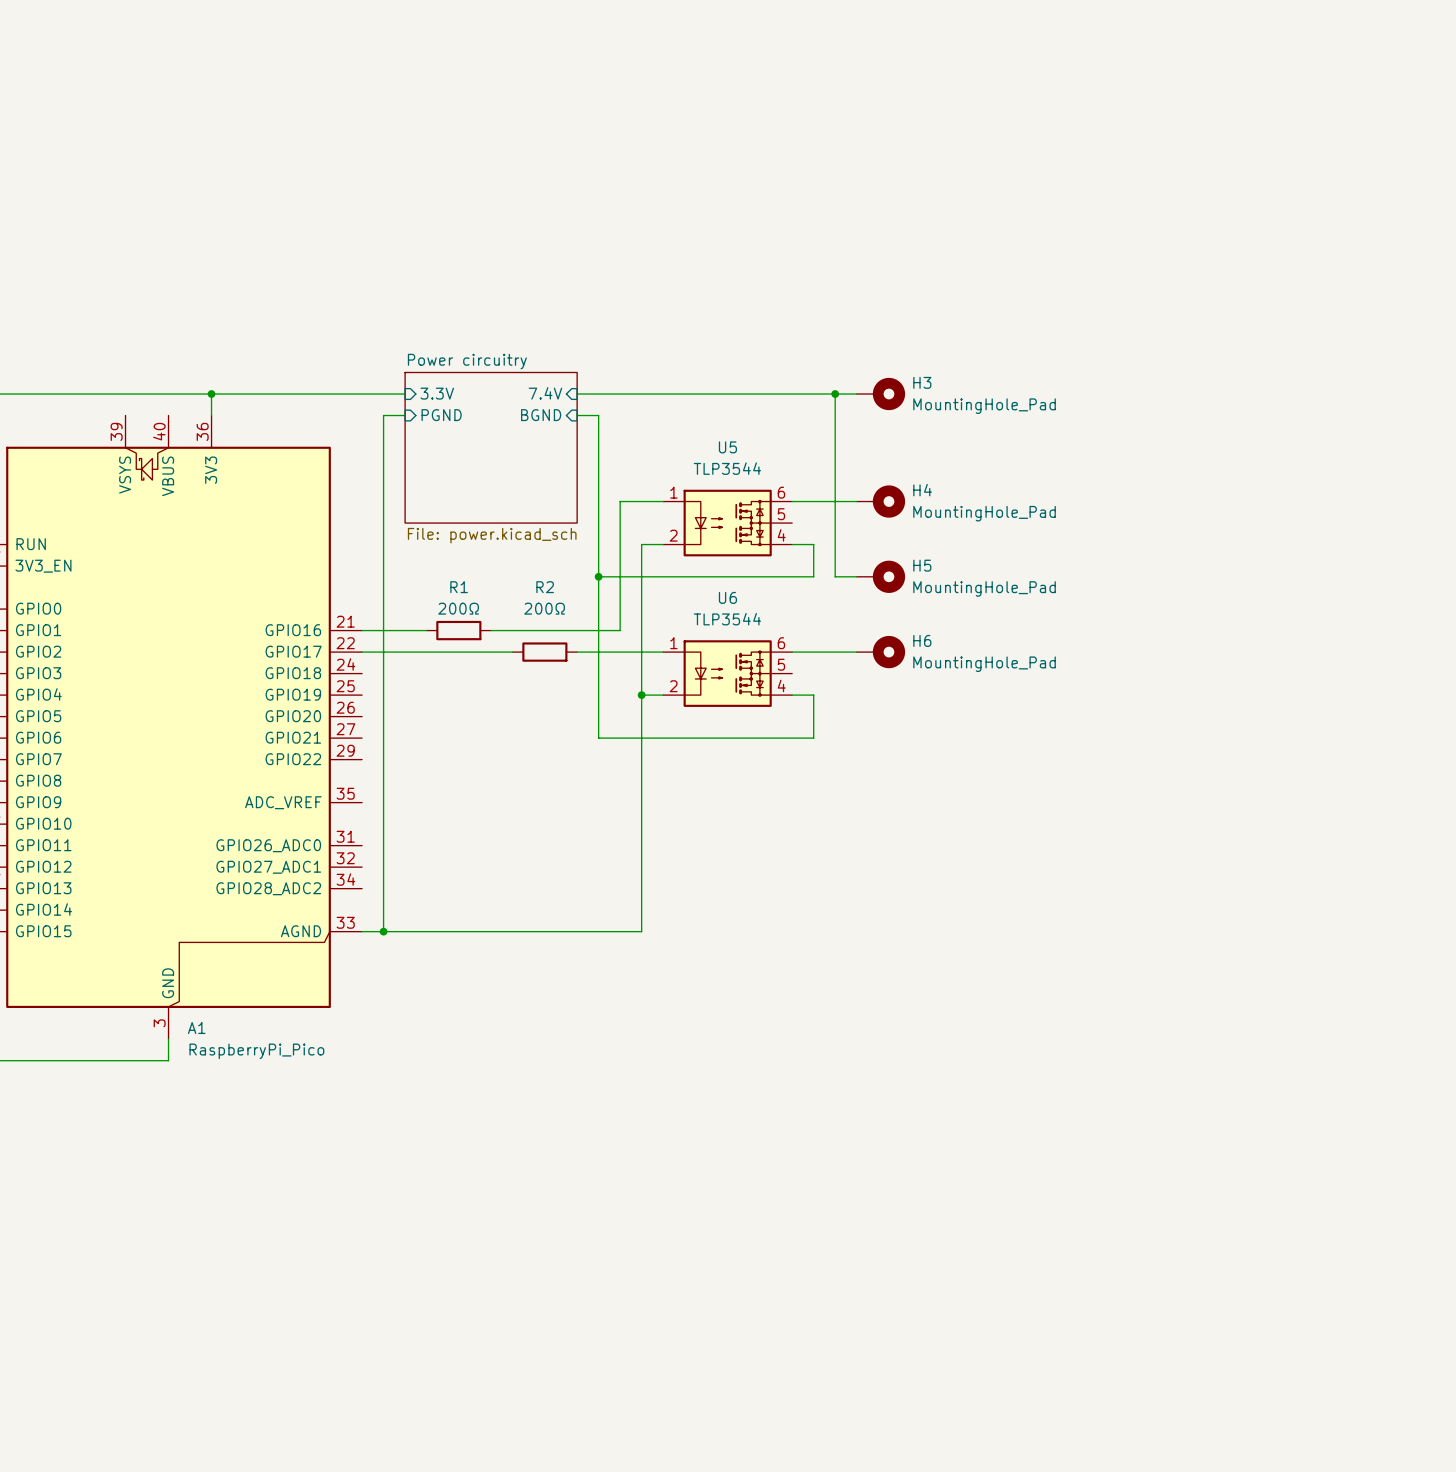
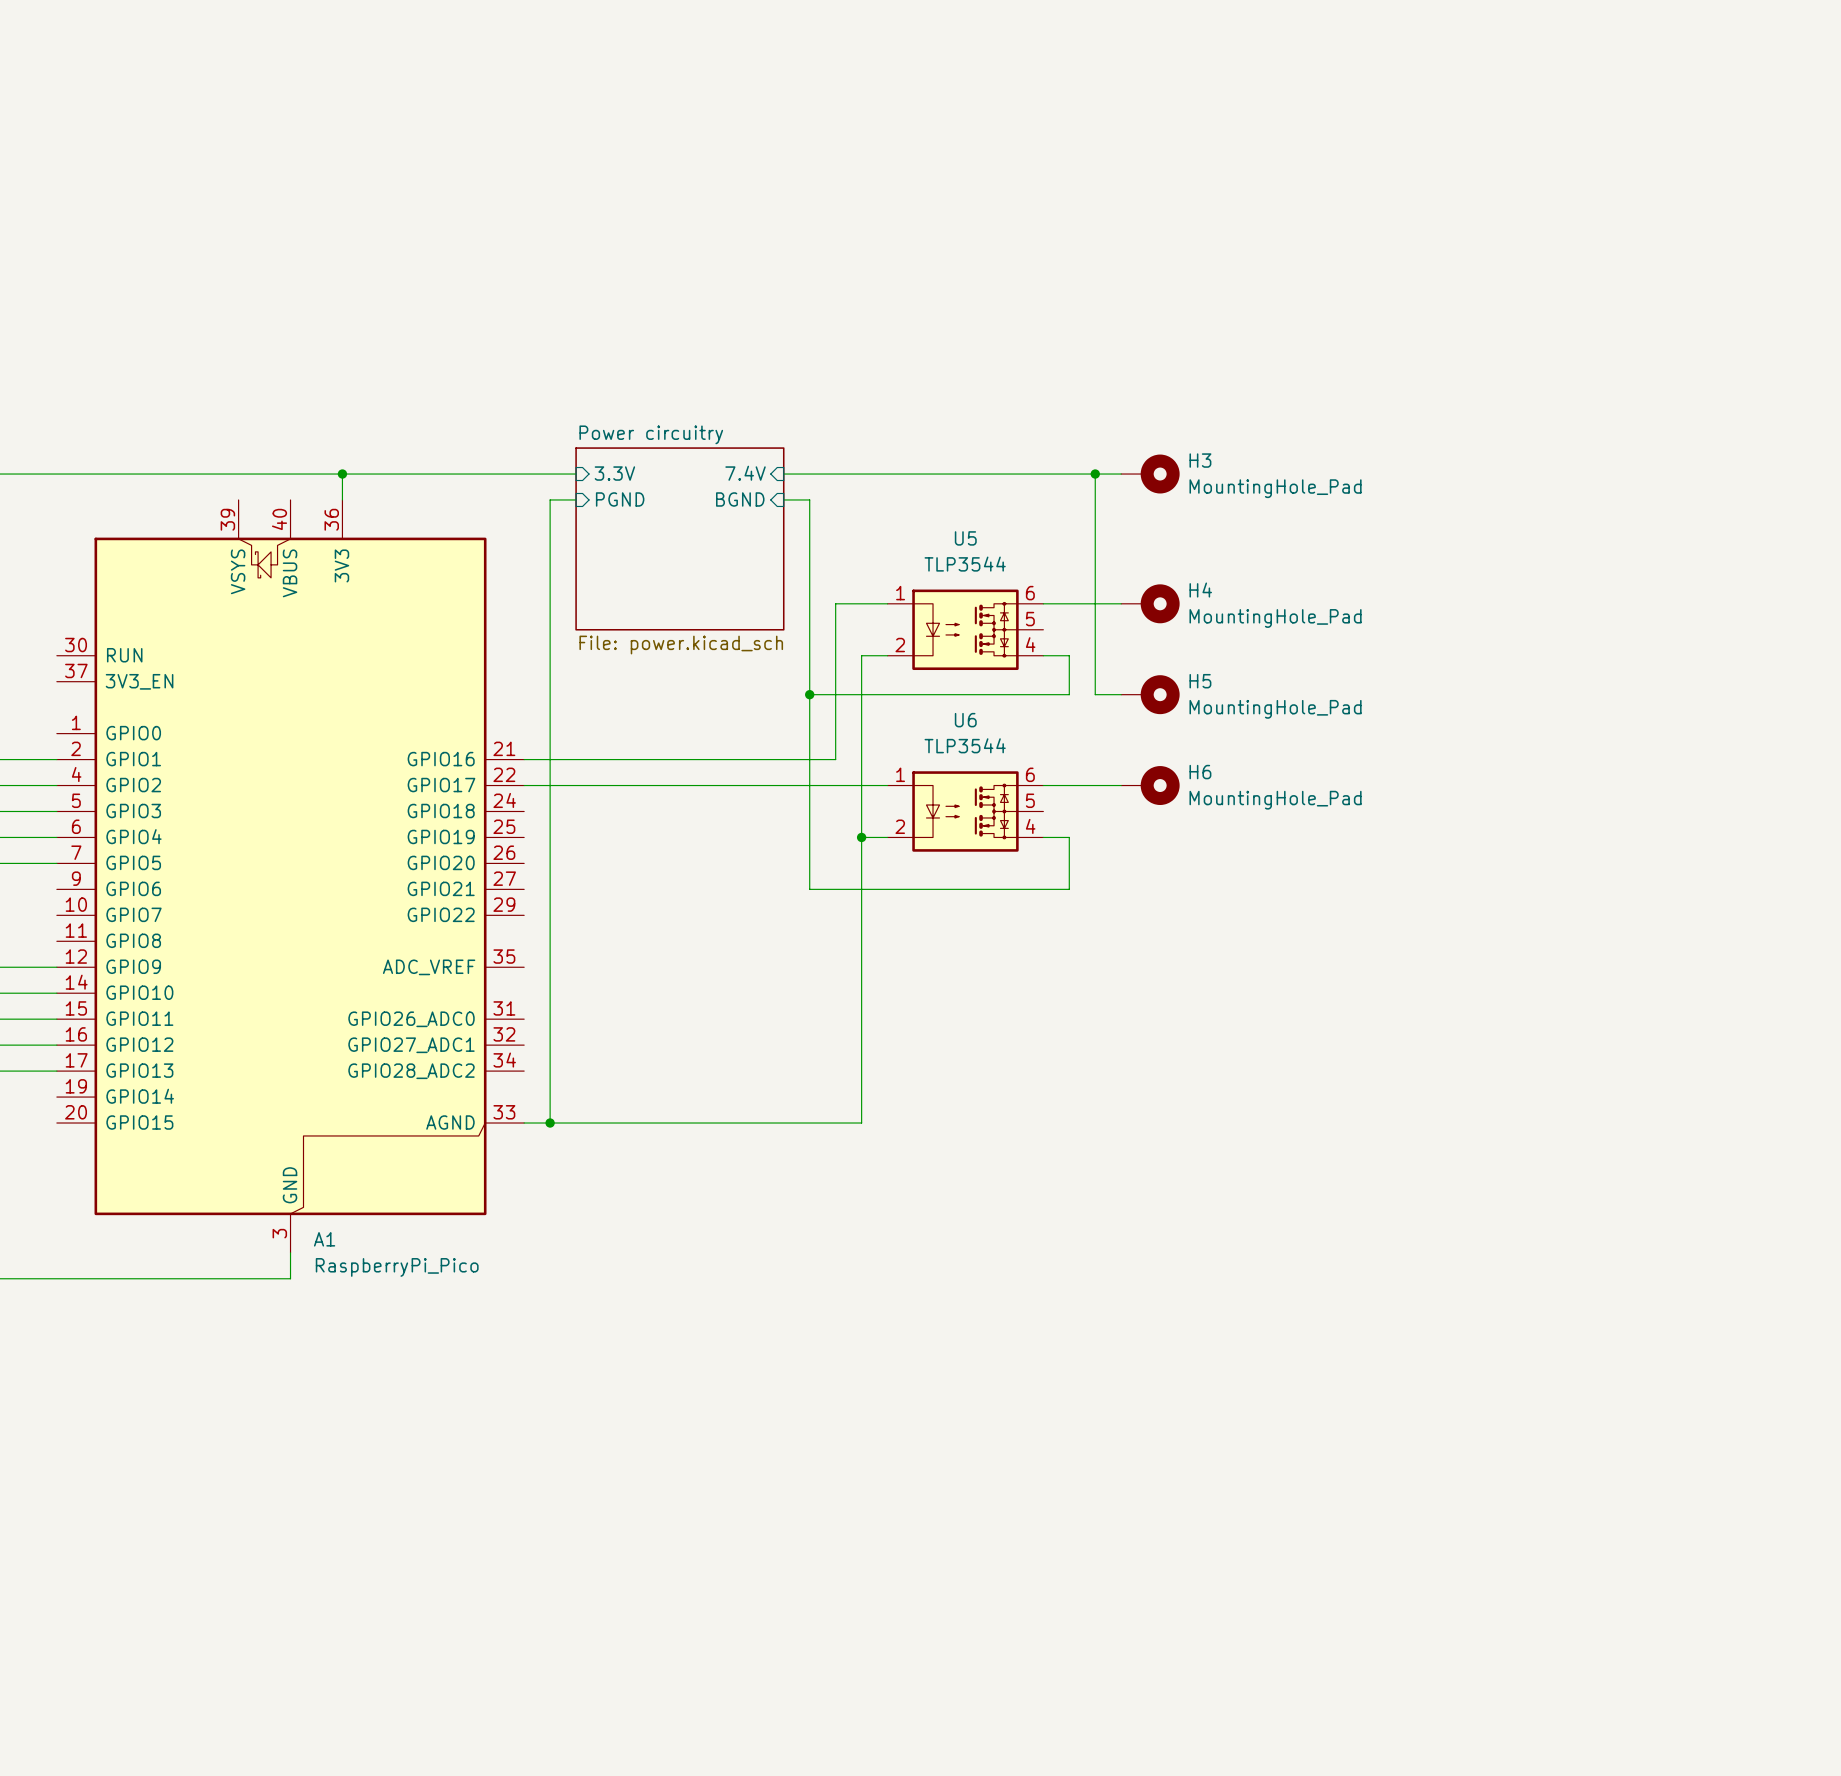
wire: none -> (602, 759) (679, 759)
R1: 200Ω (458, 630) -> none
wire: none -> (705, 785) (783, 785)
R2: 200Ω (544, 652) -> none

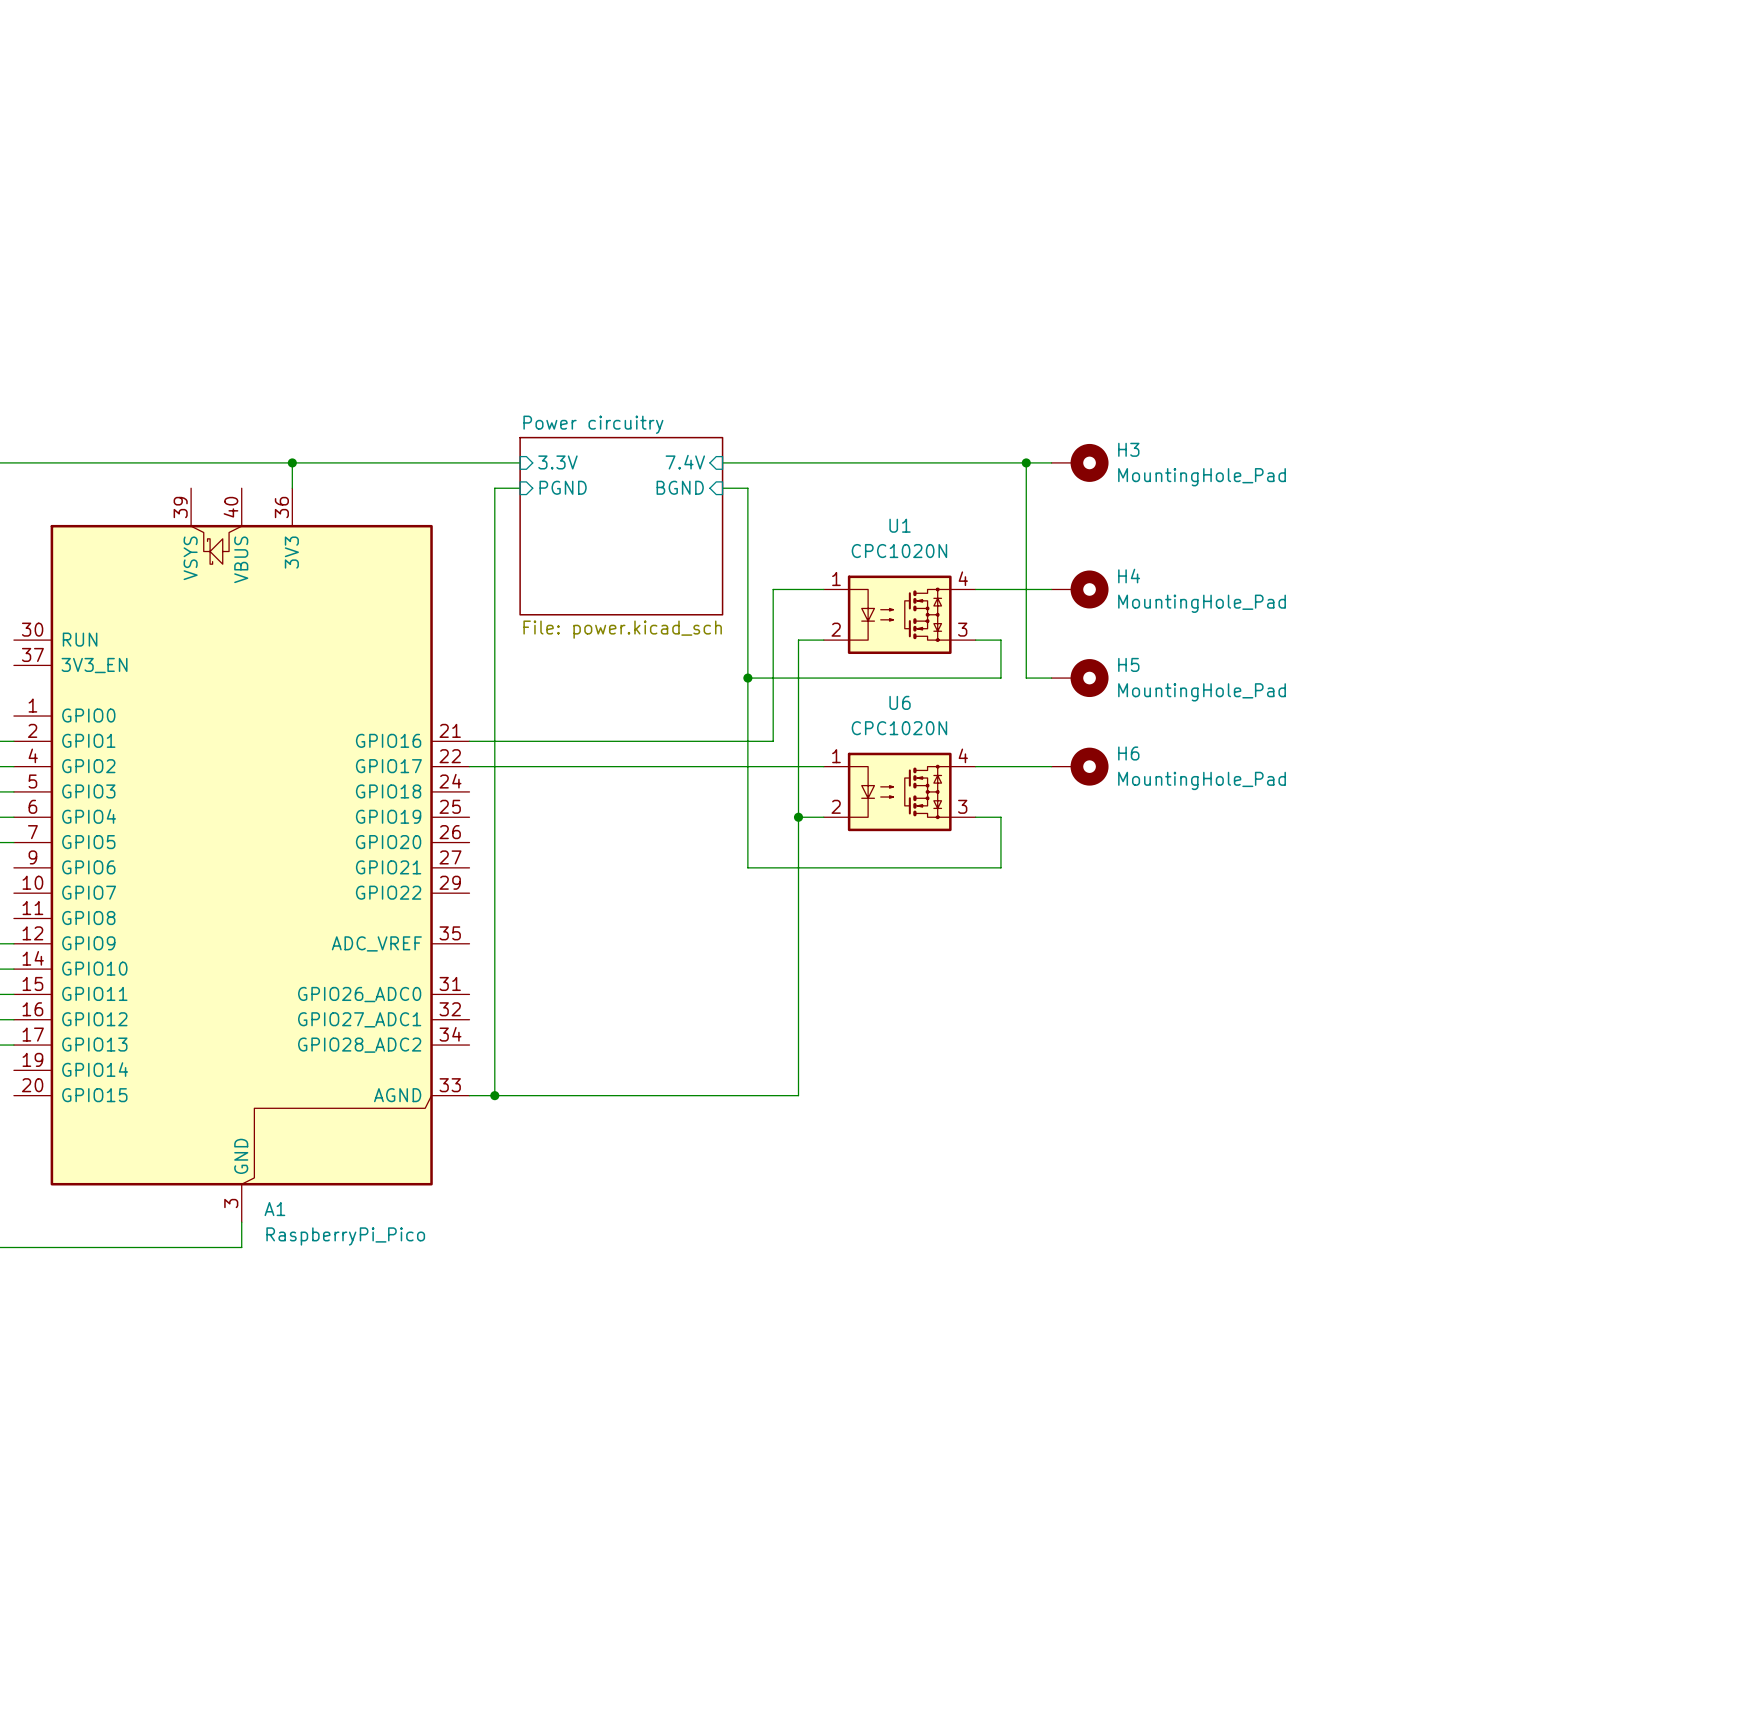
U5: TLP3544 (965, 629) -> none
U1: none -> CPC1020N (899, 614)
U6 value: TLP3544 (965, 745) -> CPC1020N (899, 728)
U6 symbol: [887, 771, 1044, 852] -> [823, 752, 976, 832]

